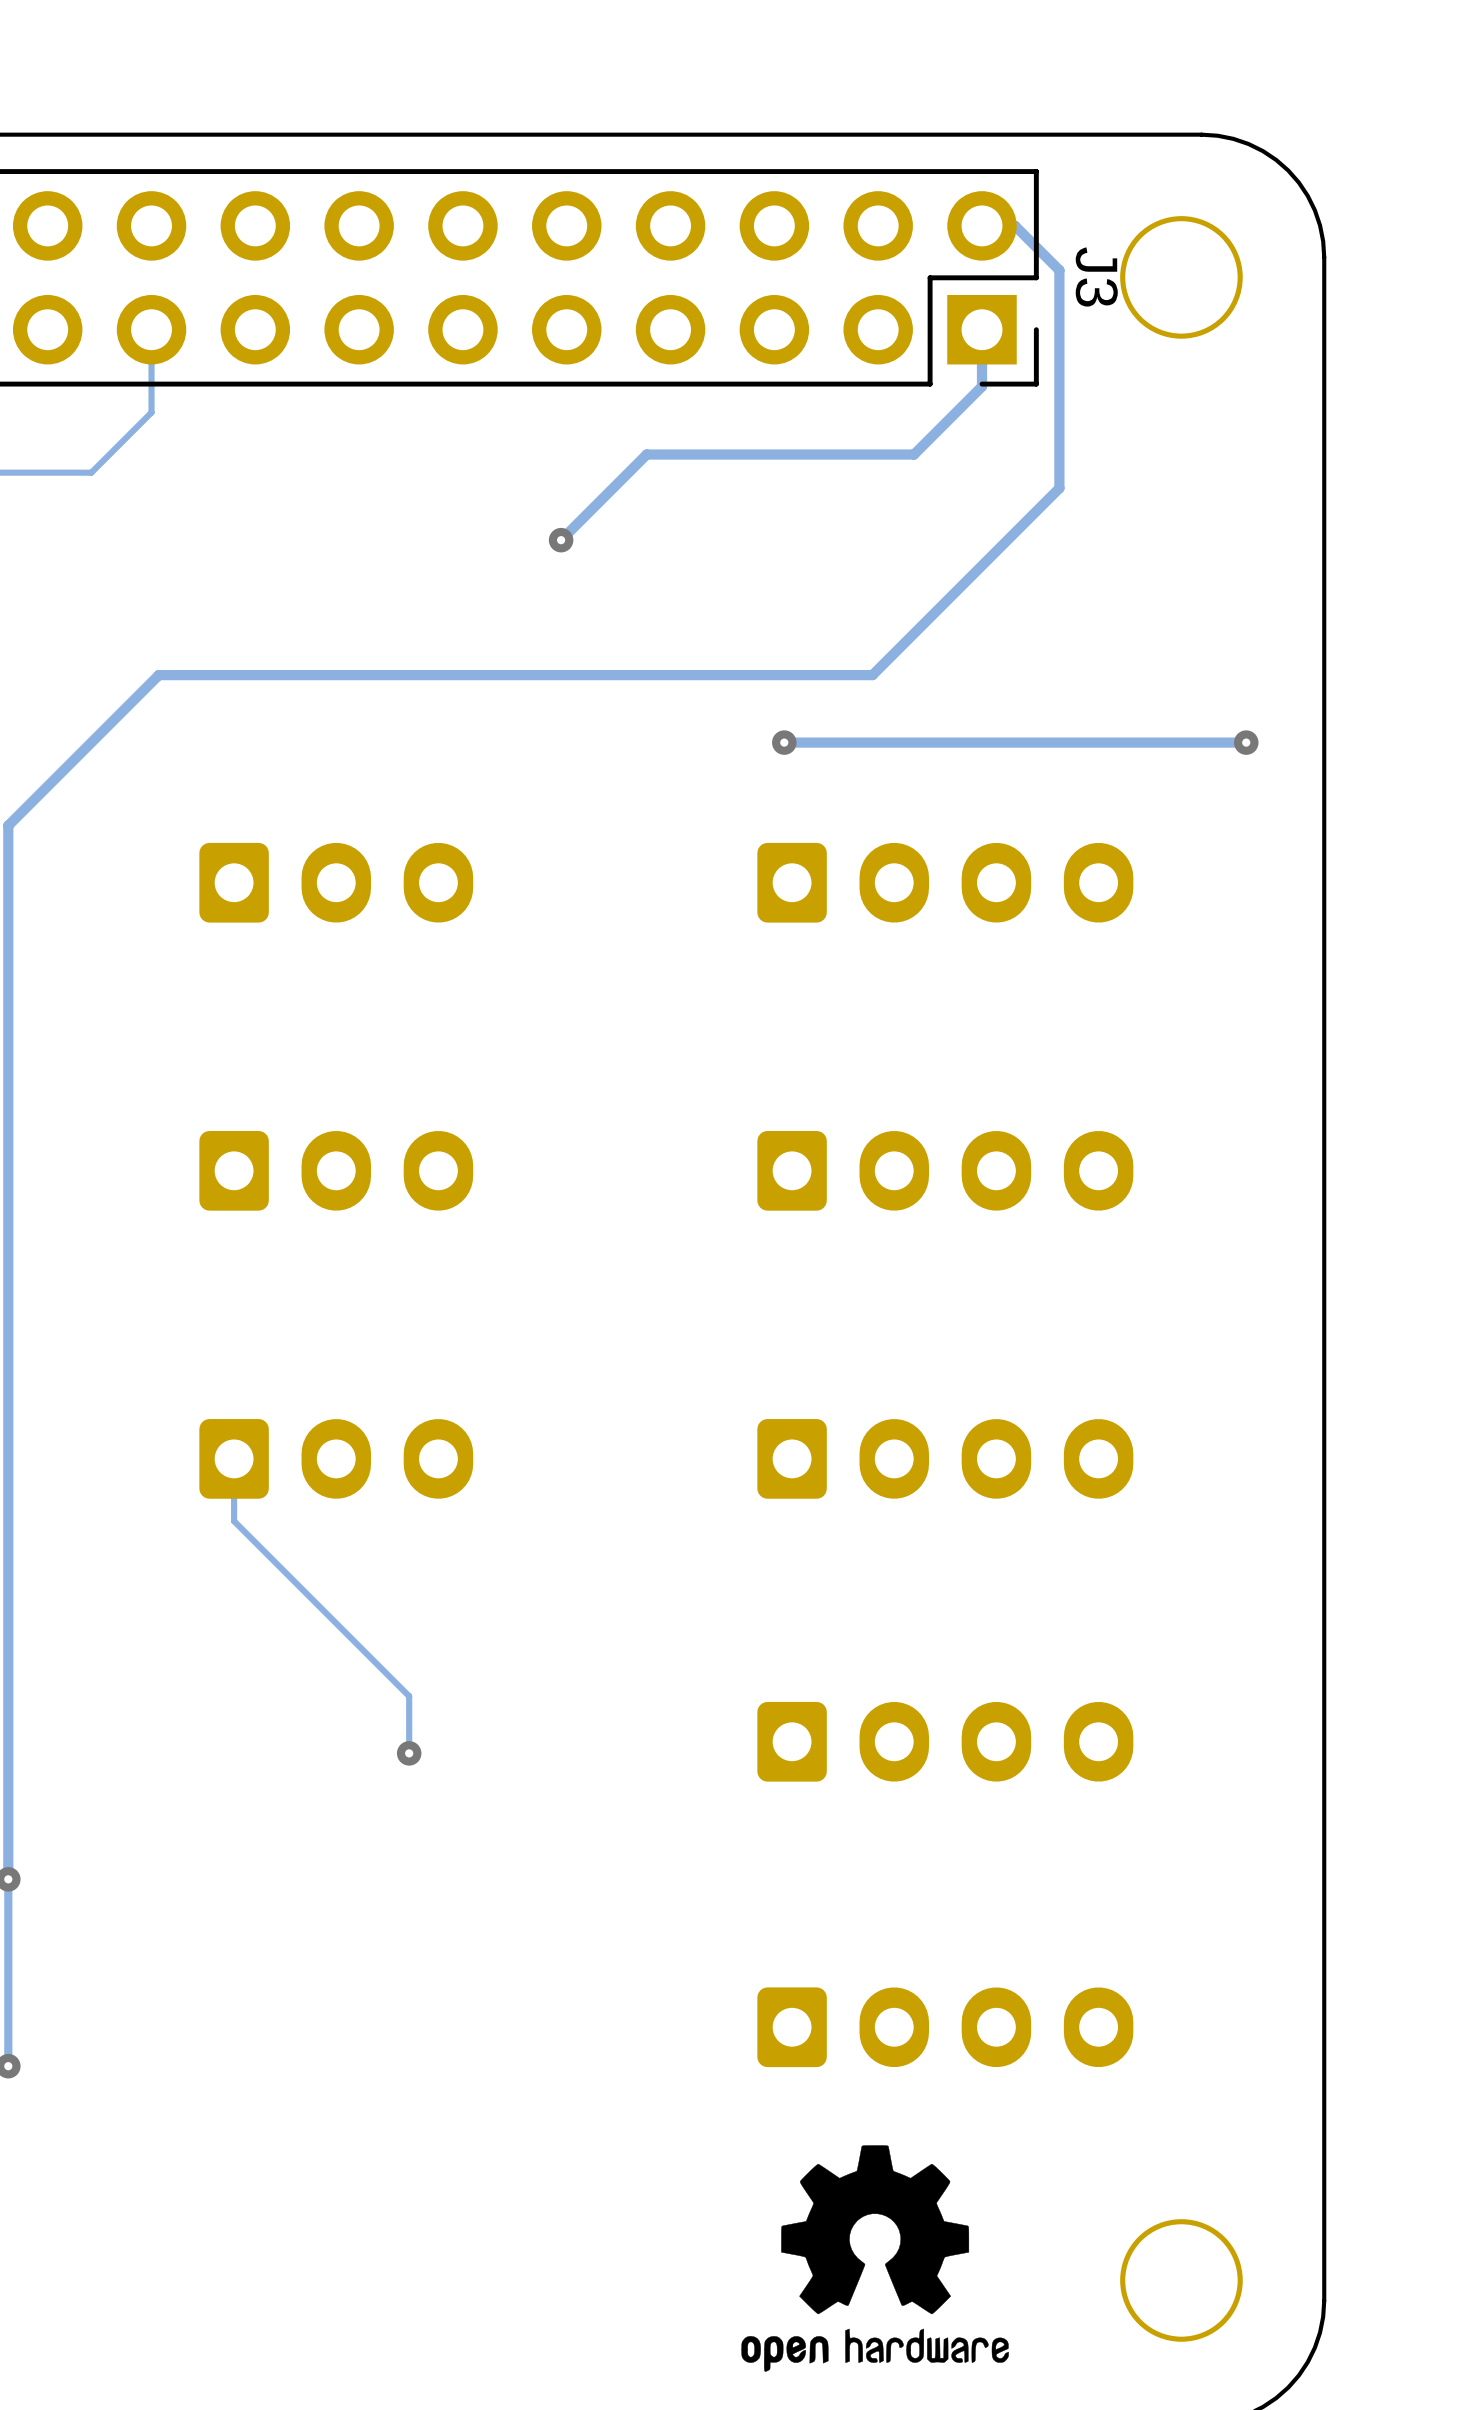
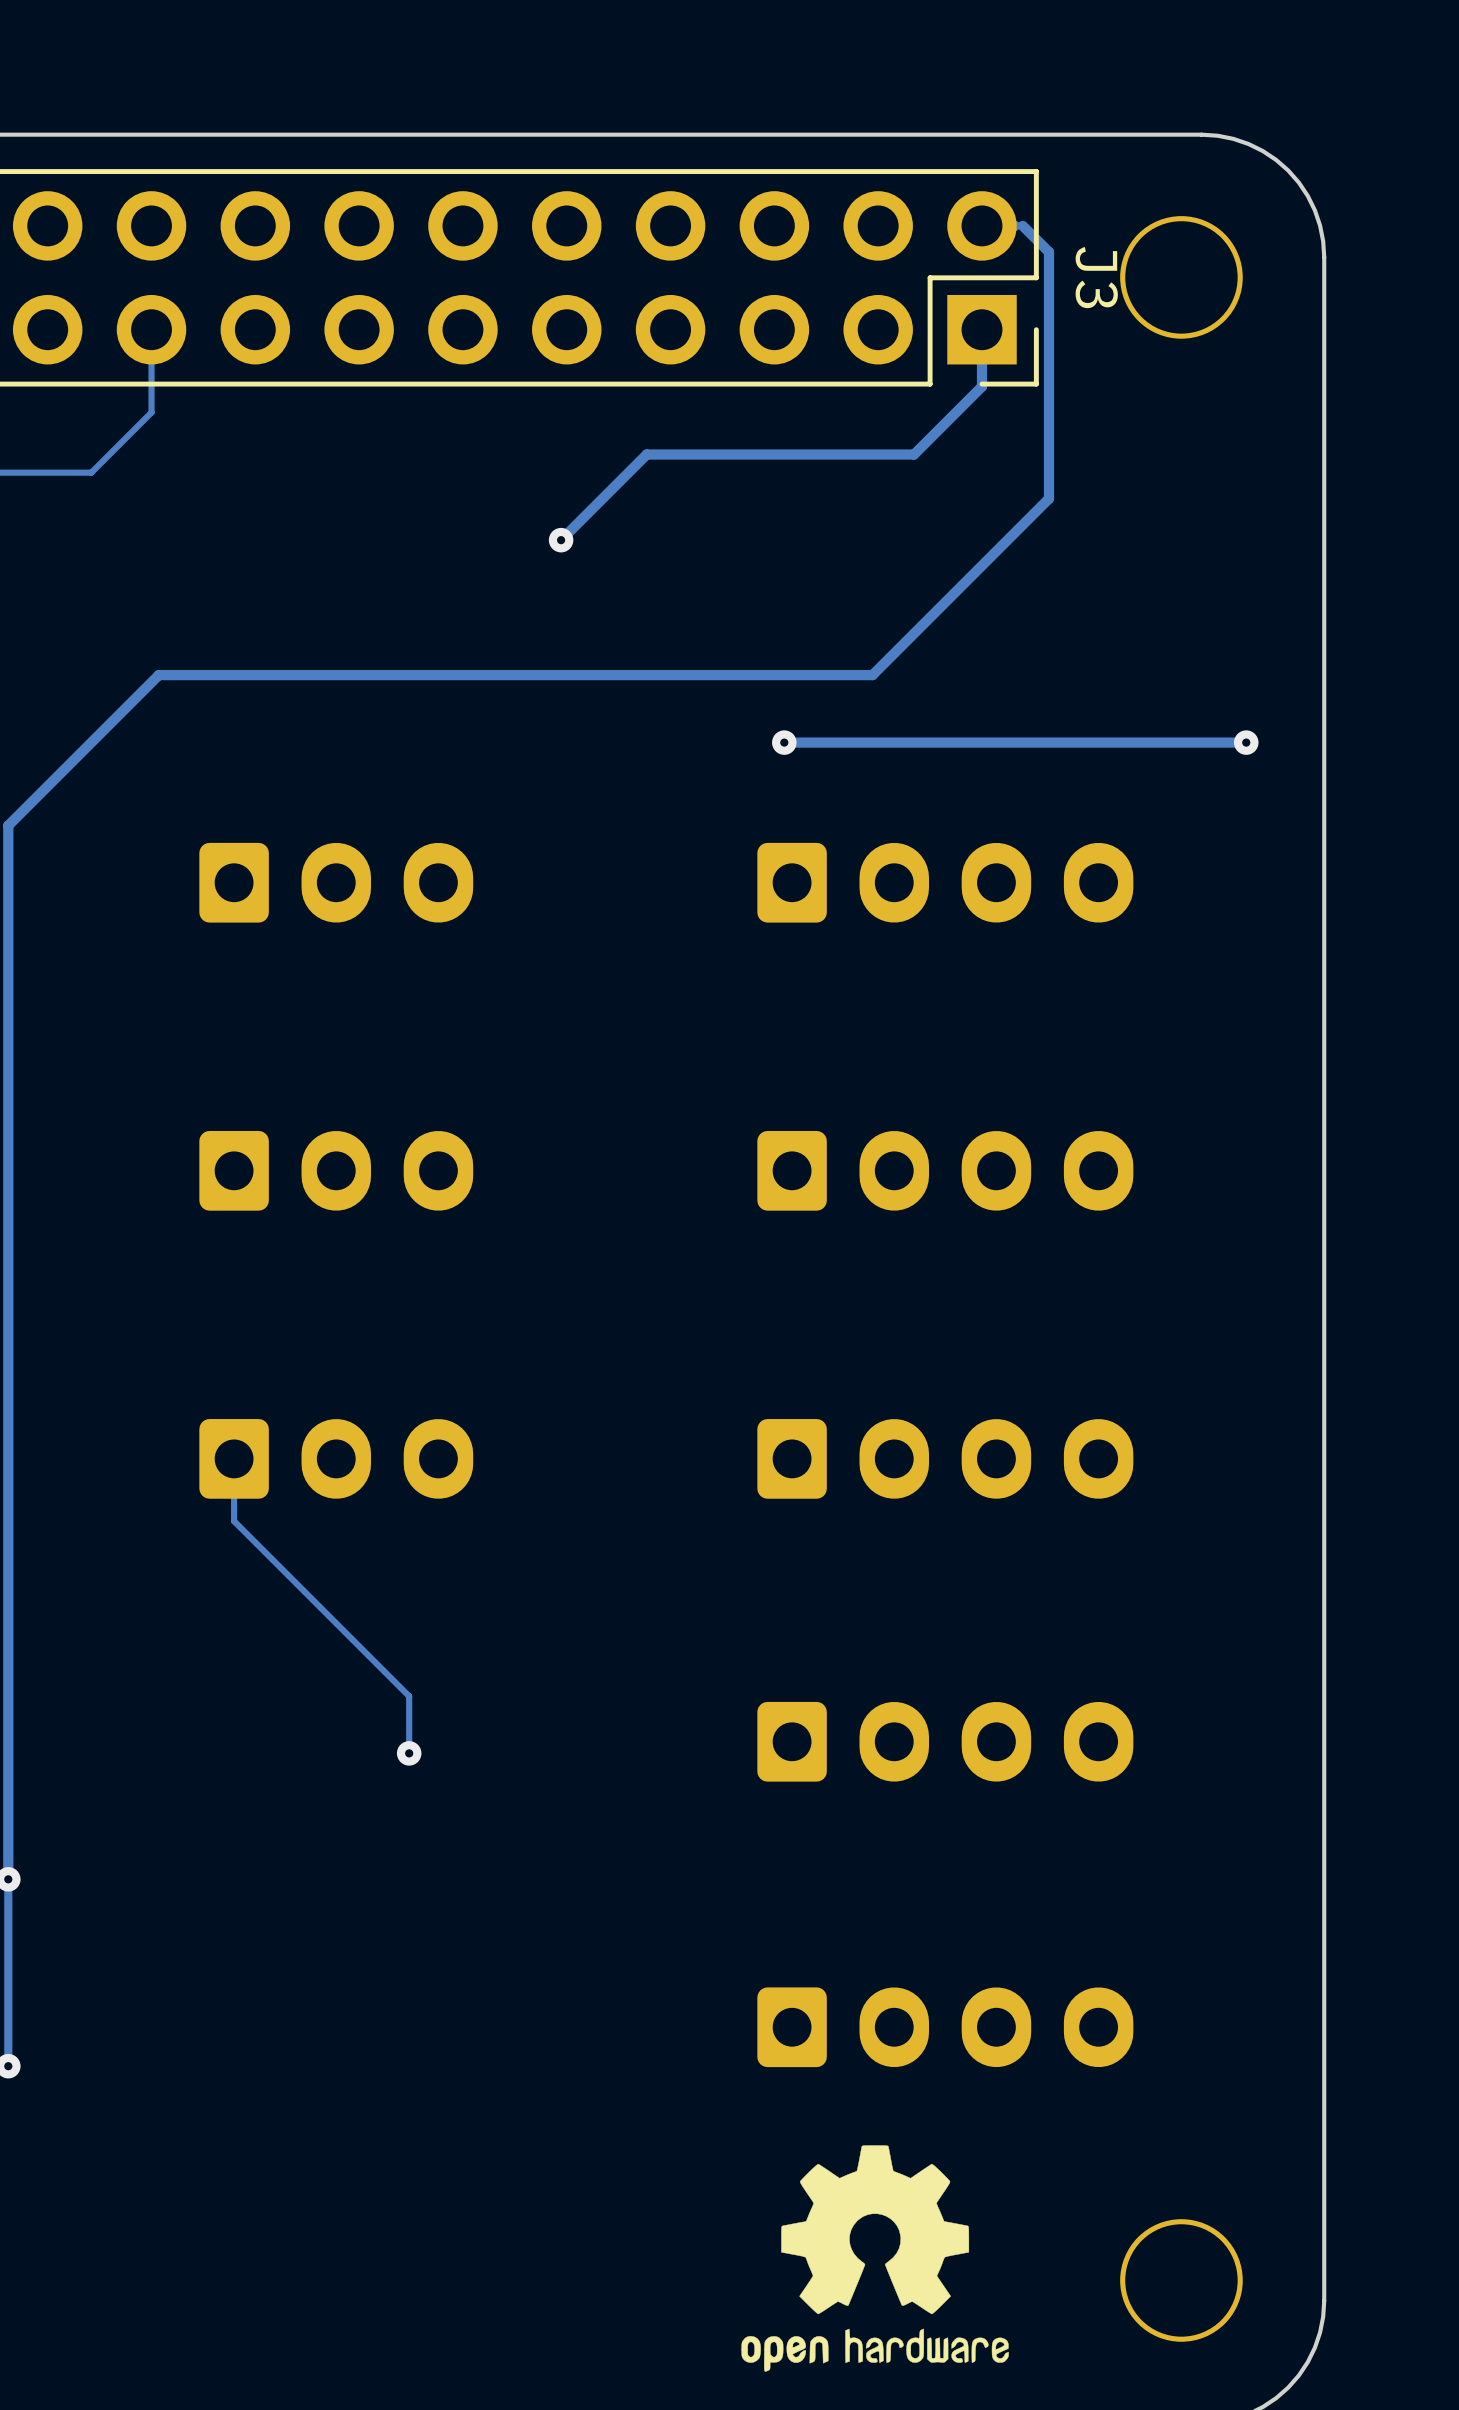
track: (1015, 225) (1059, 270) (1059, 488) (1049, 498) -> (982, 225) (1022, 225) (1049, 252) (1049, 498)

